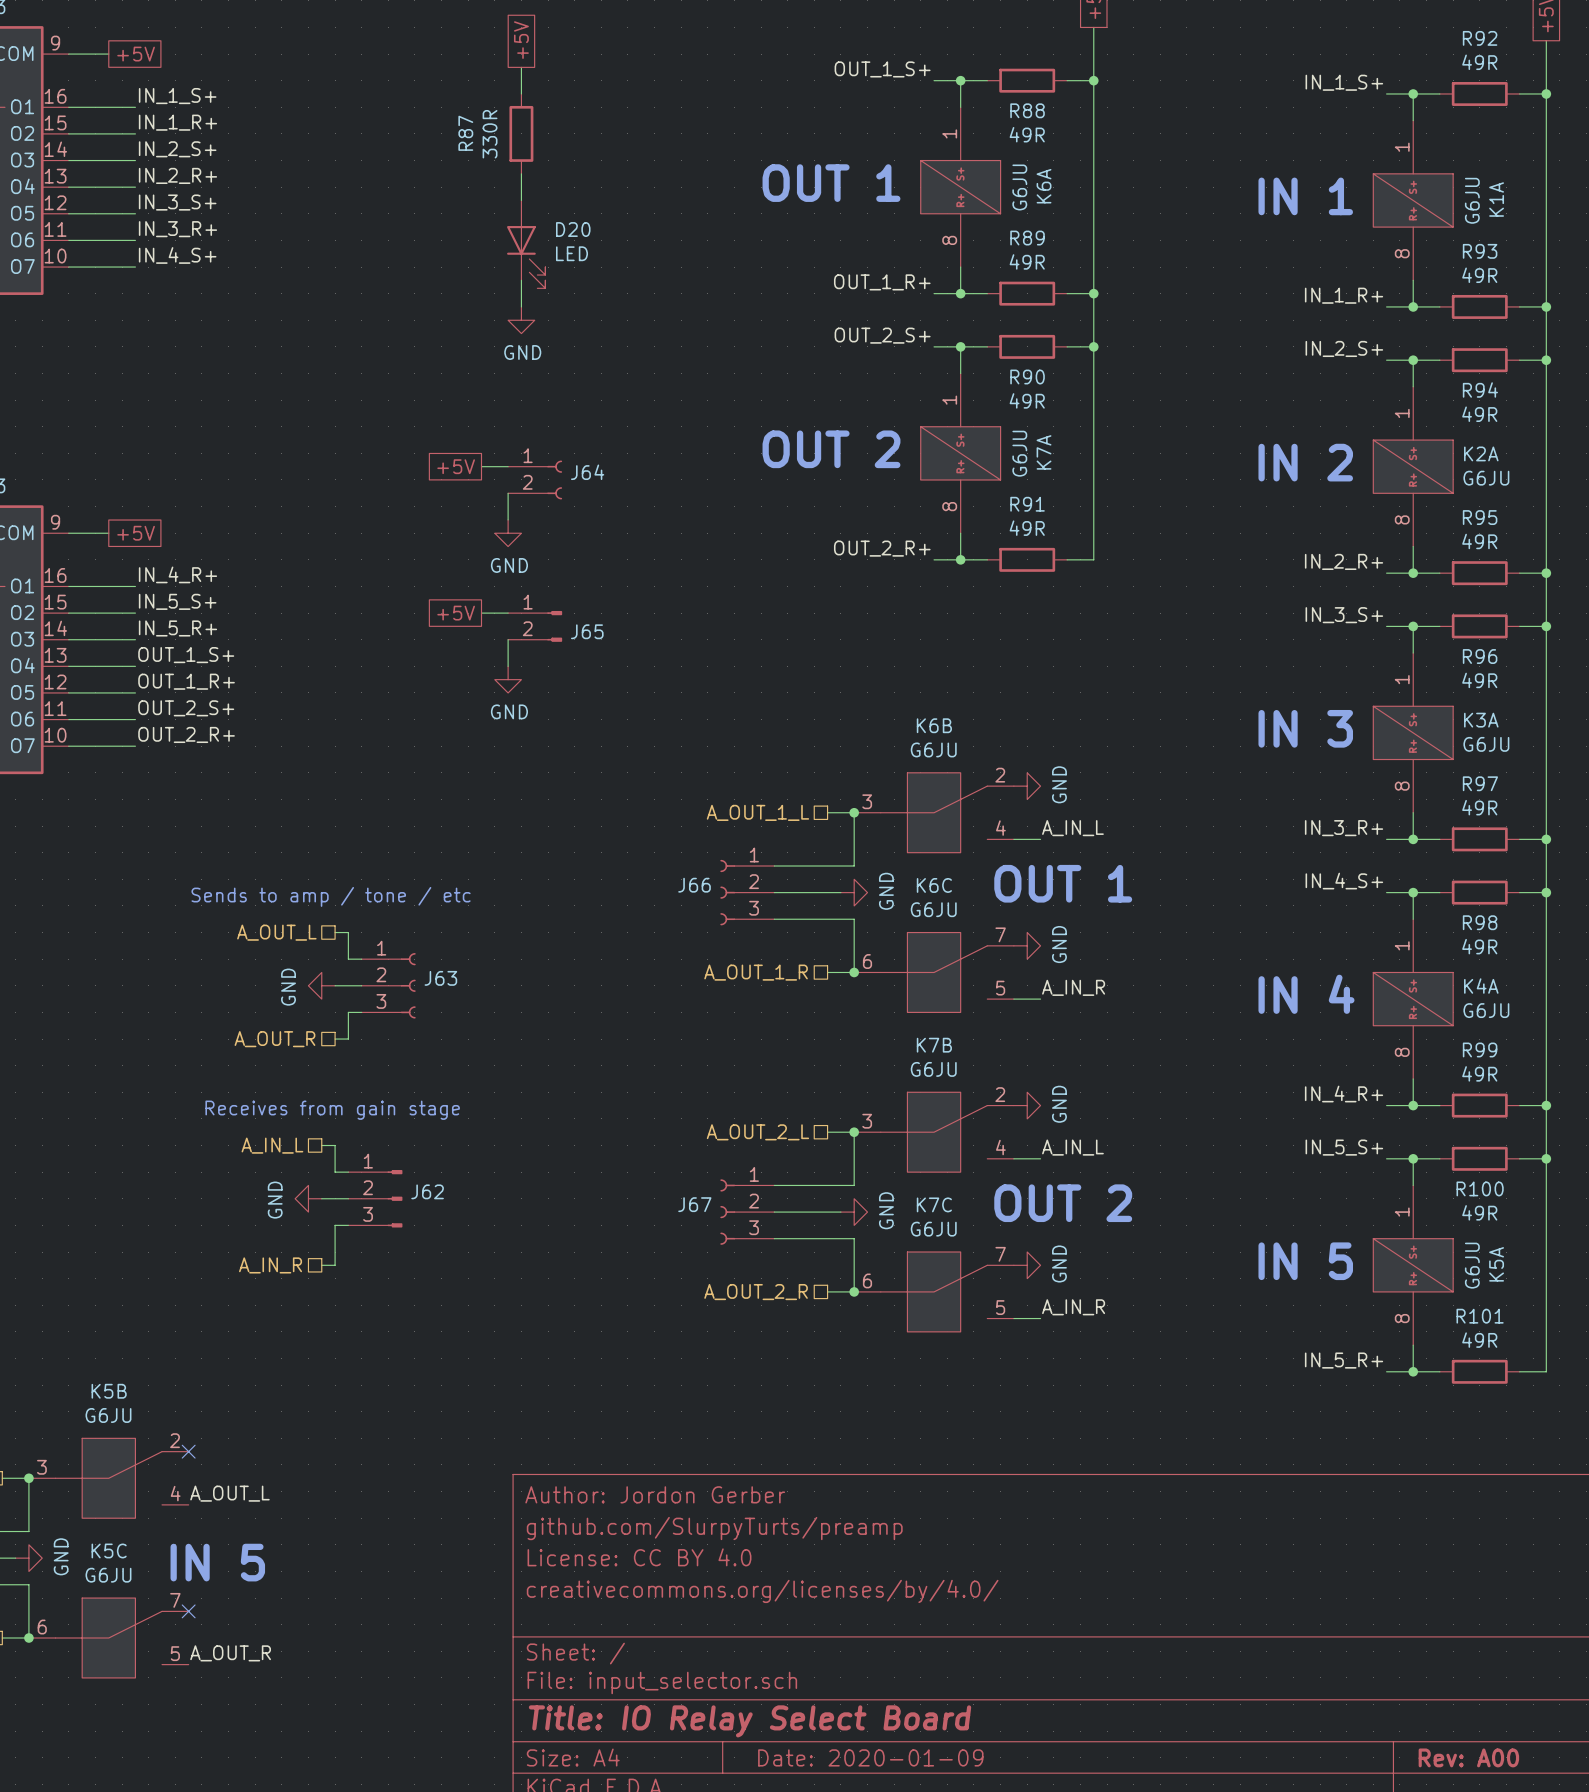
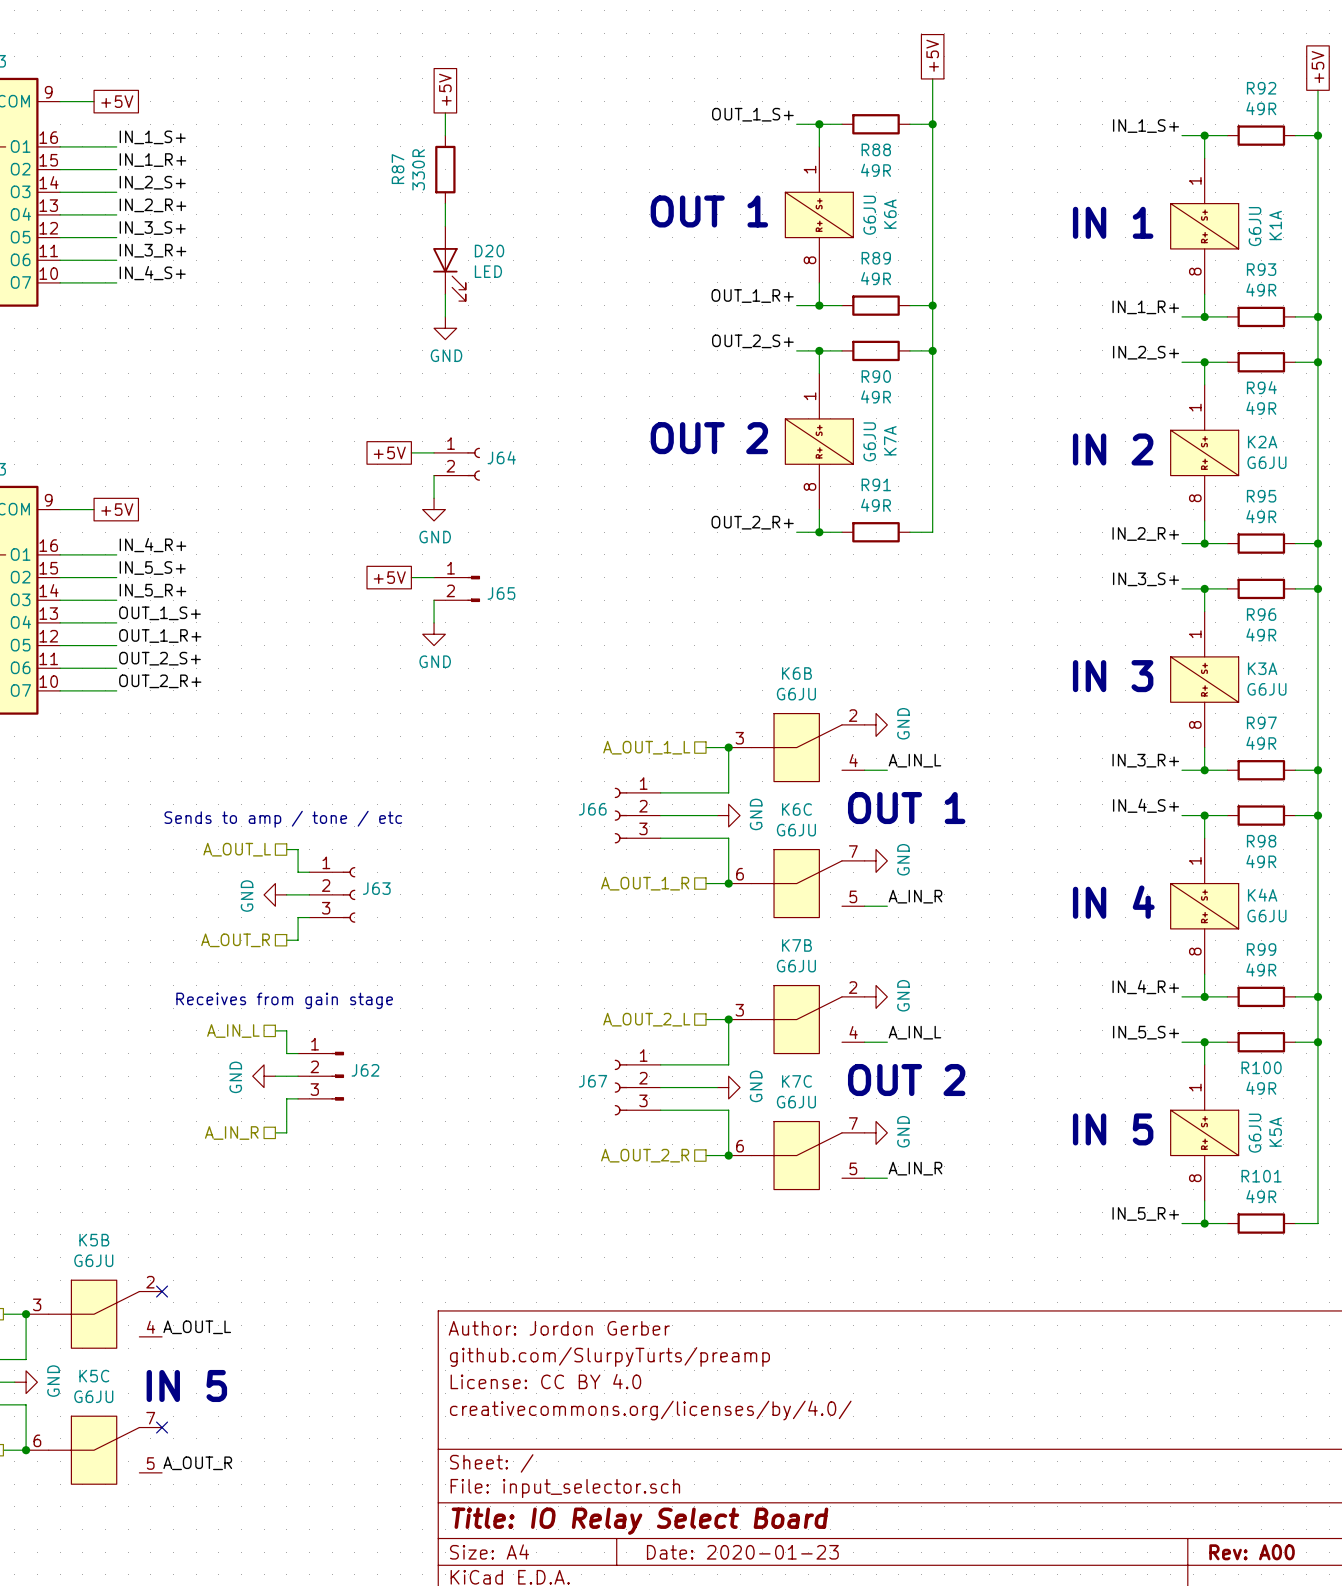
title block: Date: 2020-01-09 (870, 1757) -> Date: 2020-01-23 (742, 1552)

